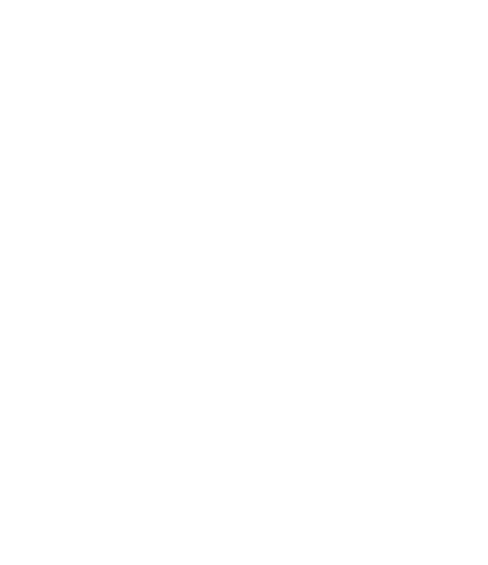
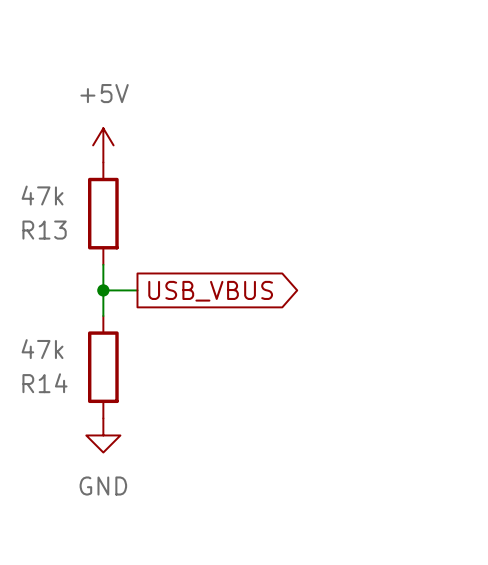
power symbol: none -> +5V (103, 145)
R13: none -> 47k (103, 213)
wire: none -> (103, 264) (103, 316)
wire: none -> (103, 290) (137, 290)
junction: none -> (103, 290)
global label: none -> USB_VBUS (210, 291)
R14: none -> 47k (103, 367)
power symbol: none -> GND (103, 435)

